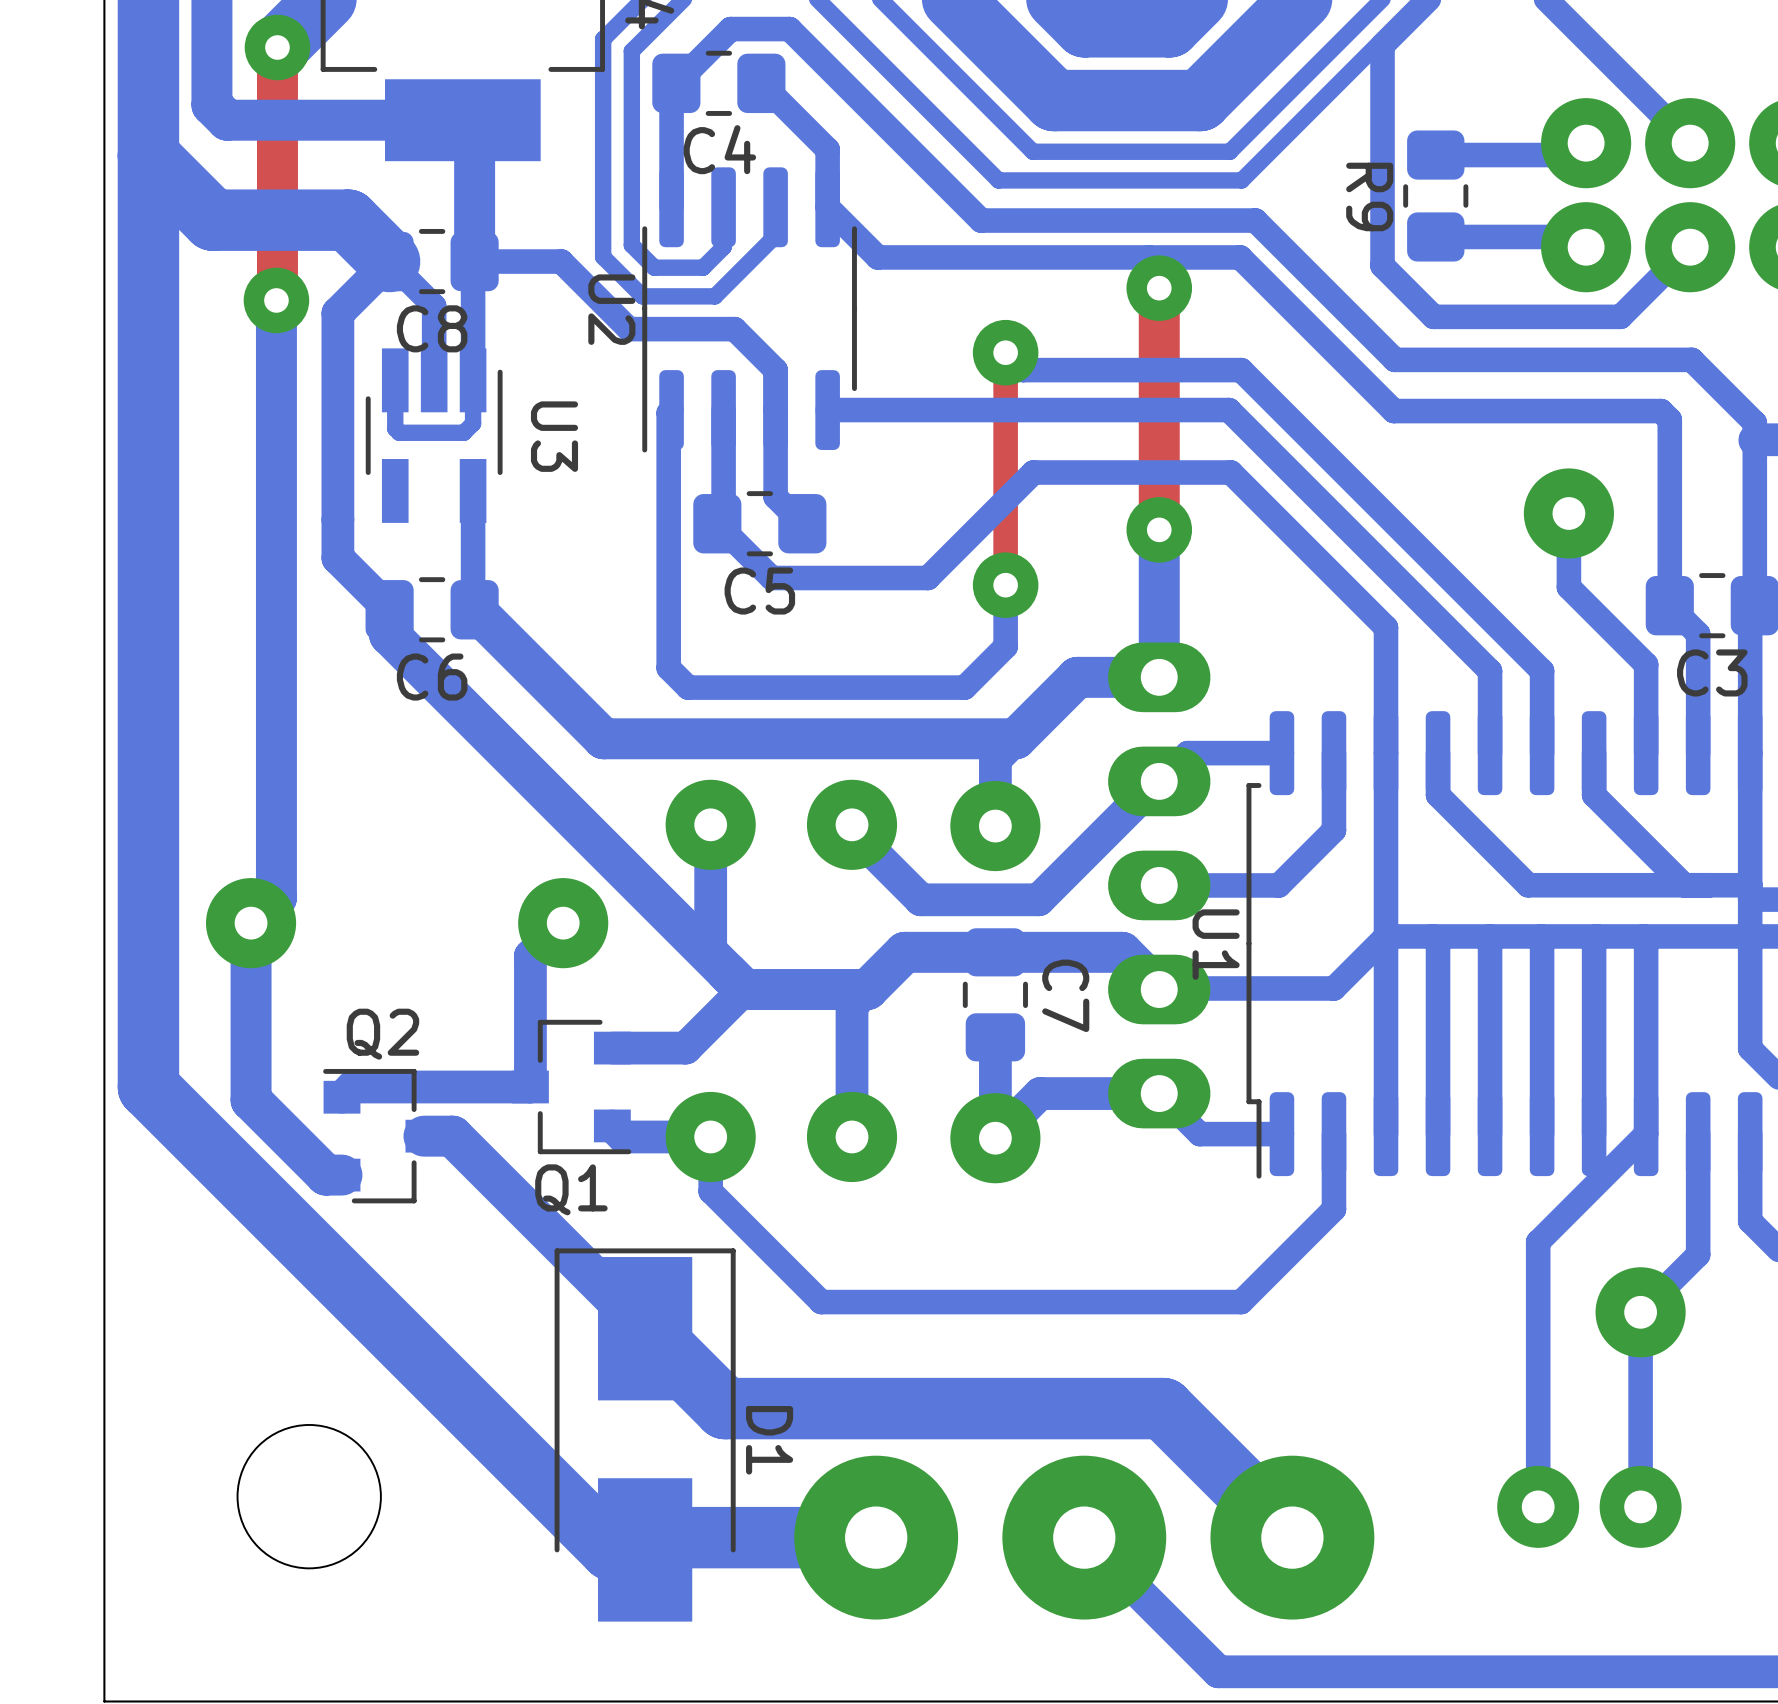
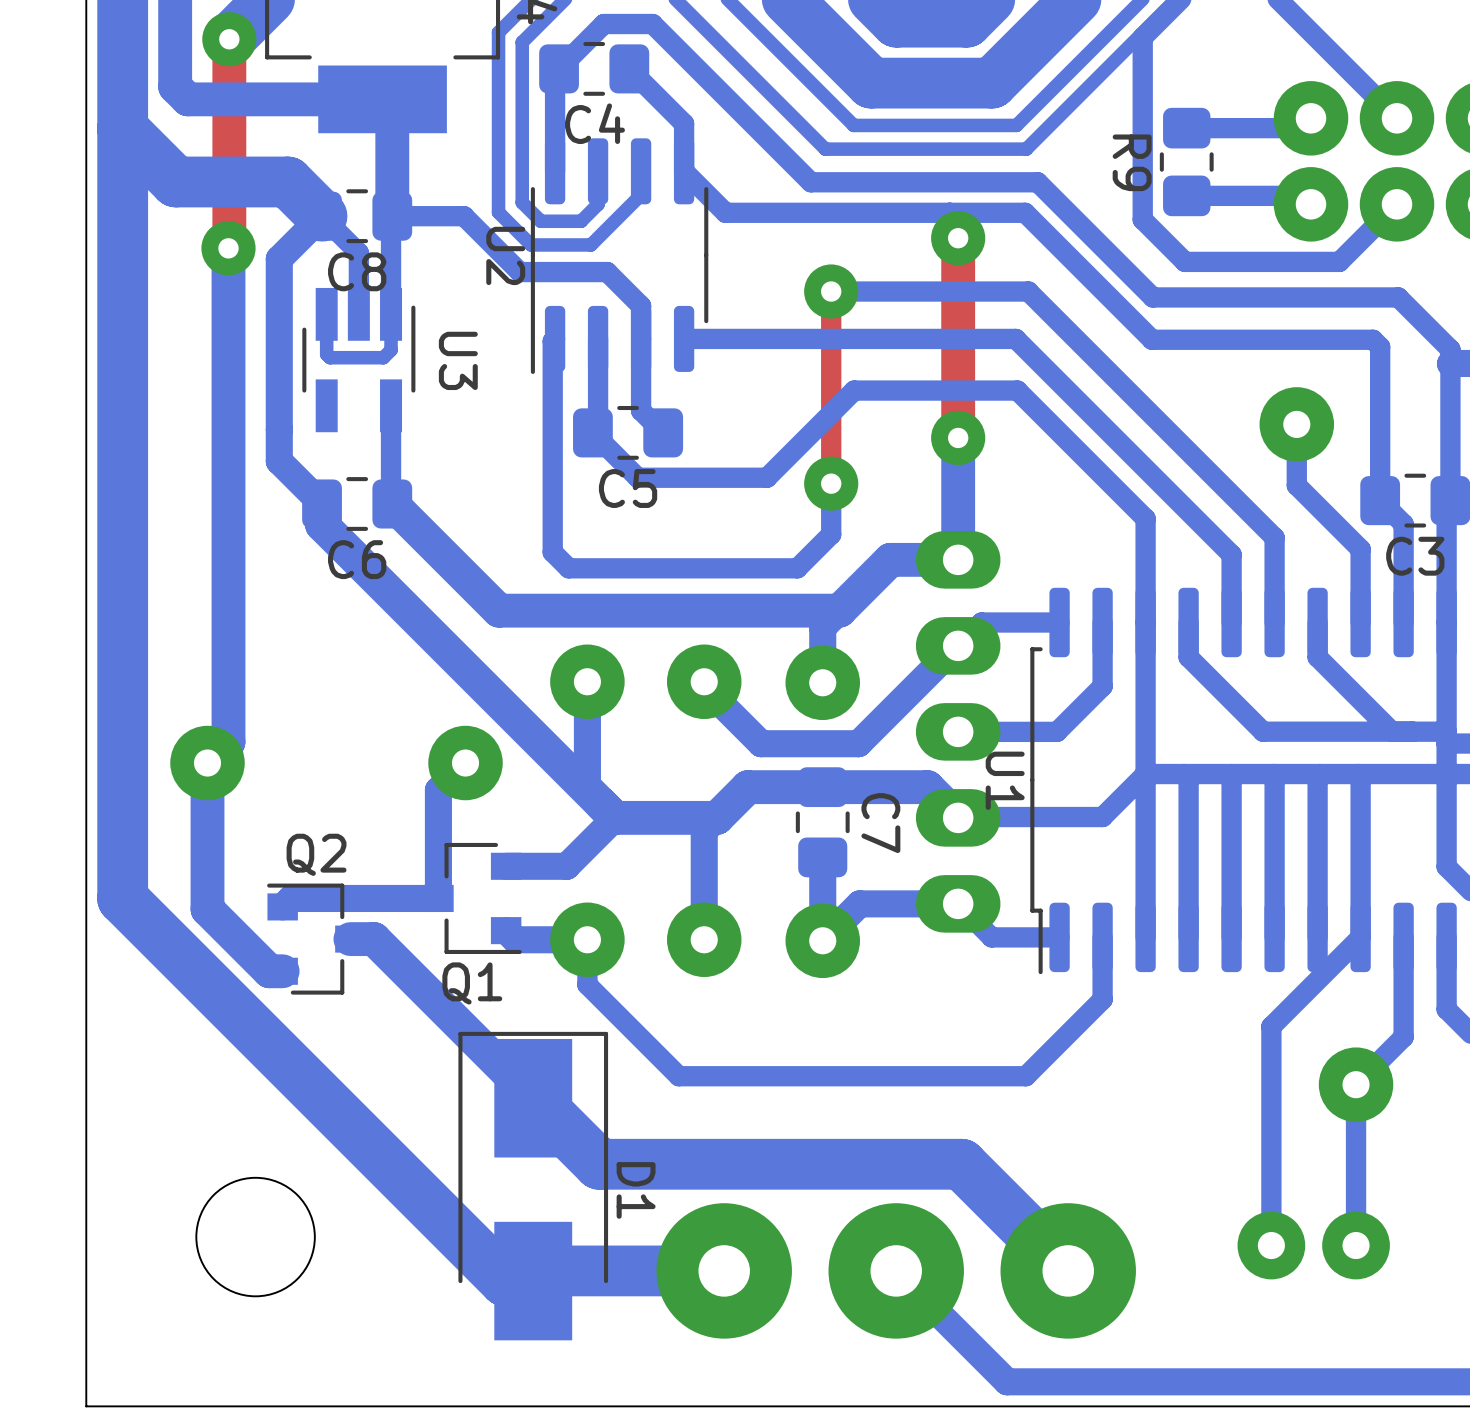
bottom track: (1005, 352) (1023, 370) (1241, 370) (1542, 671) -> (831, 291) (1028, 291) (1274, 537) (1274, 554)

